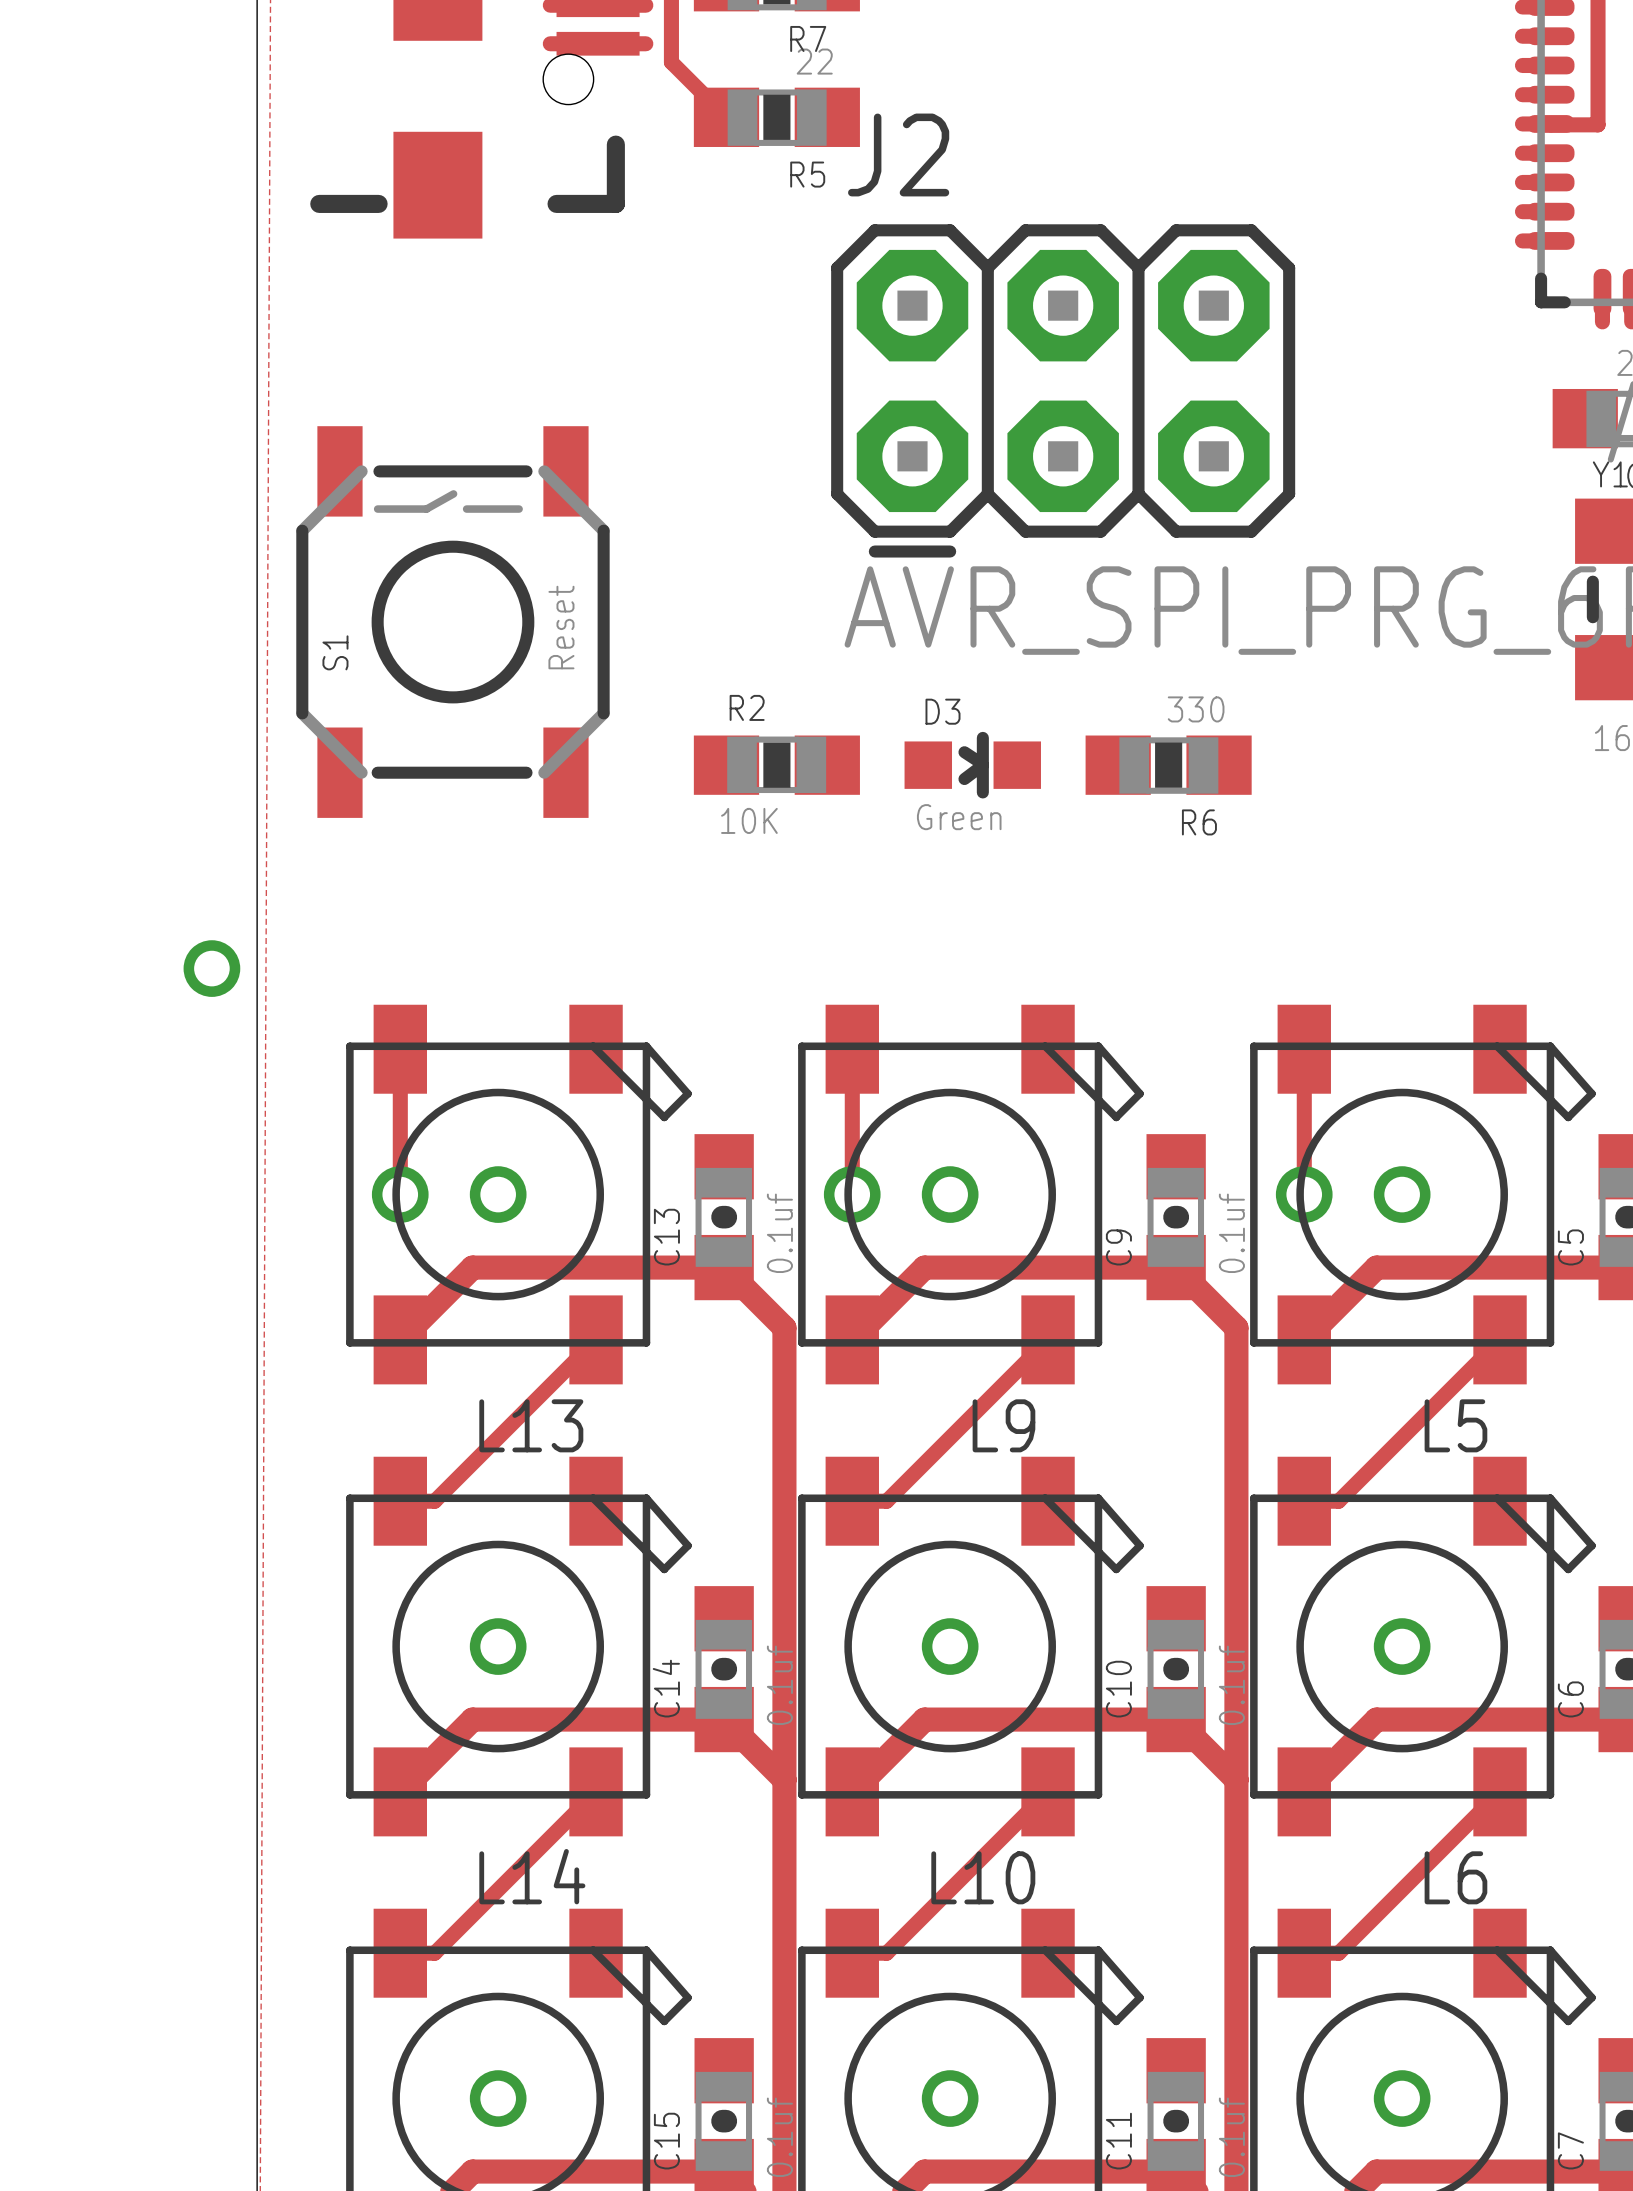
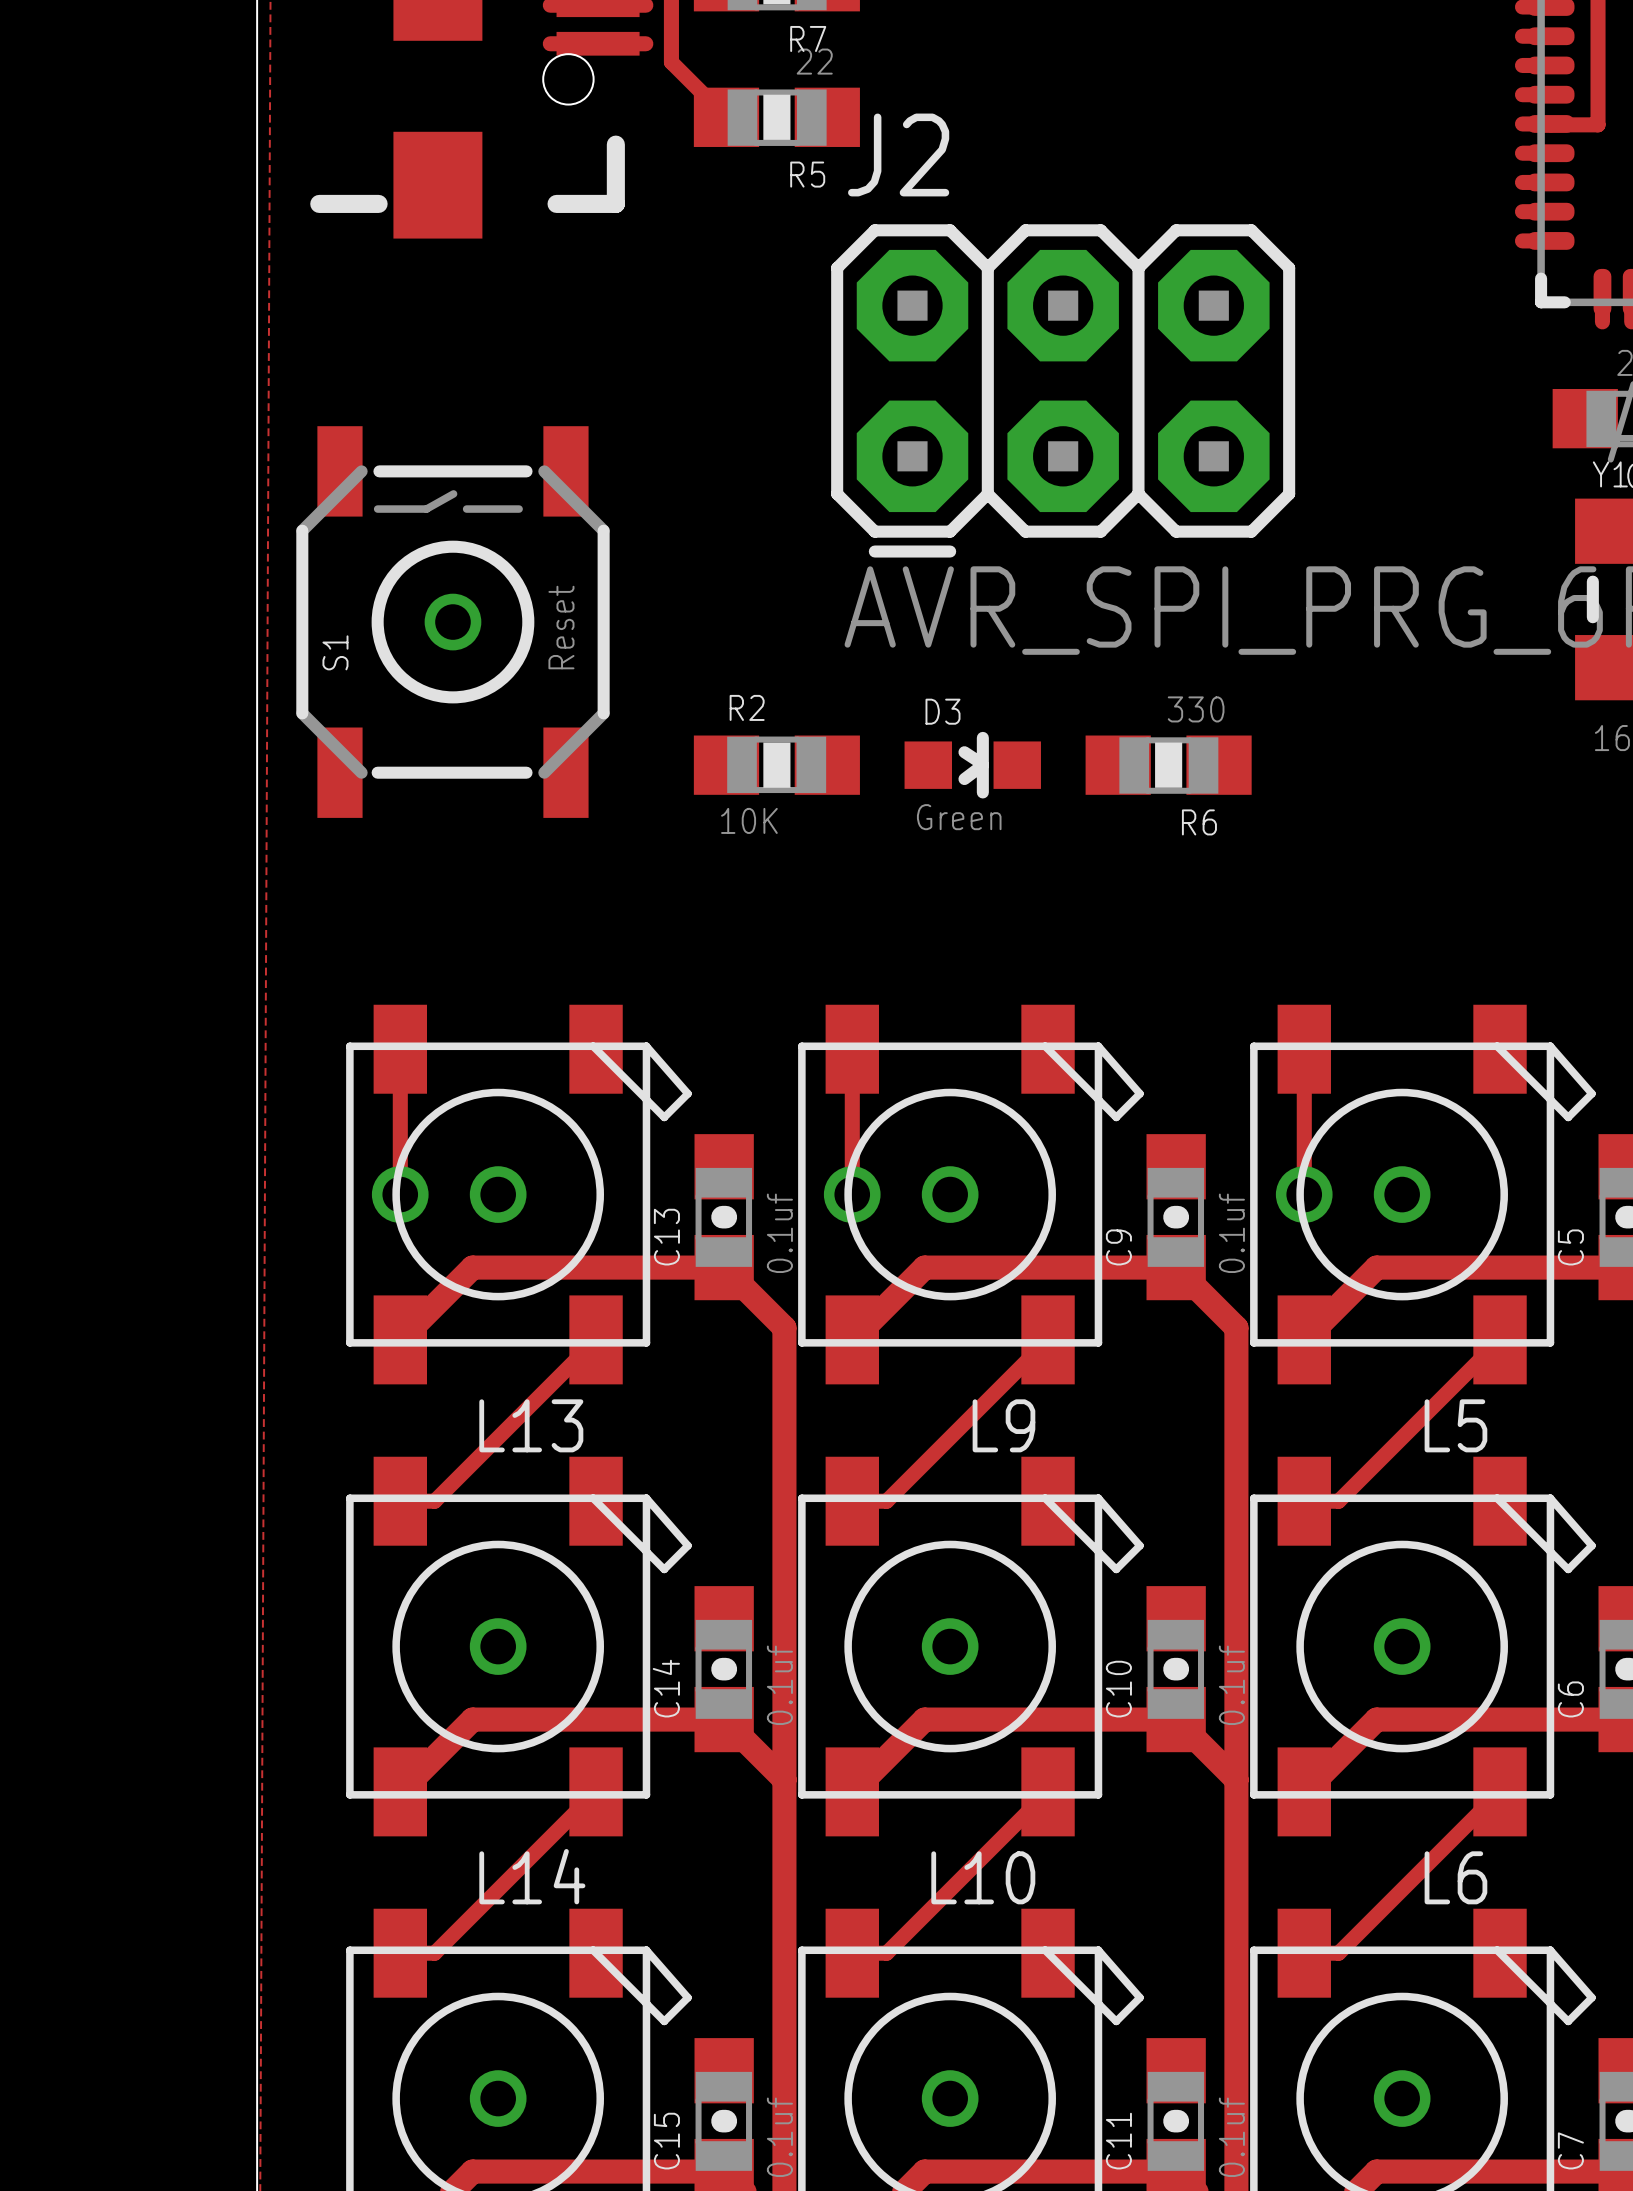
via: none -> (452, 622)
via: (211, 968) -> none

